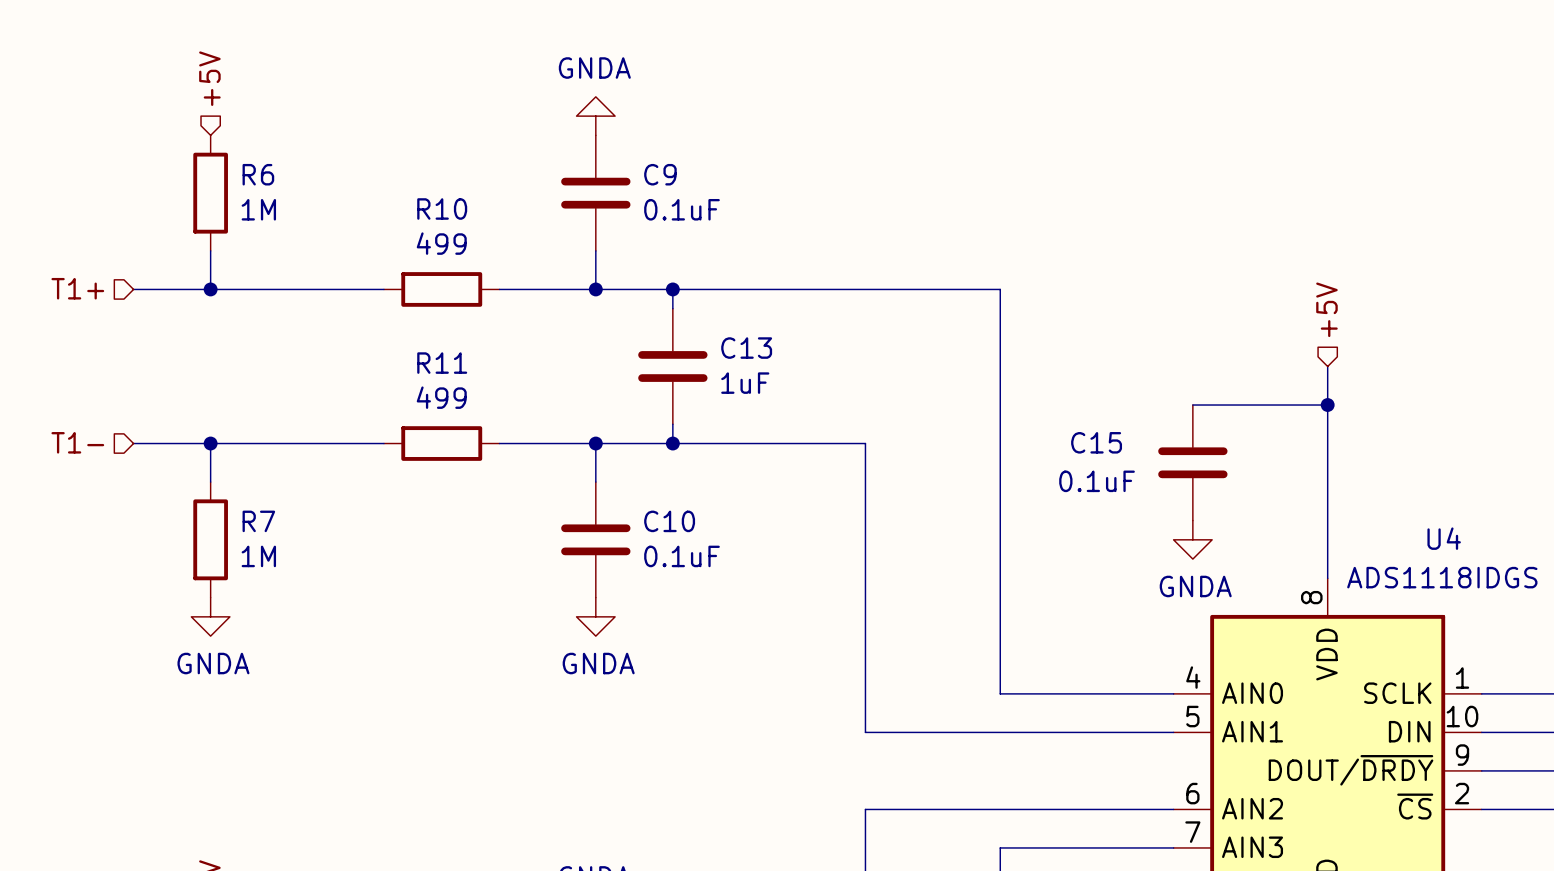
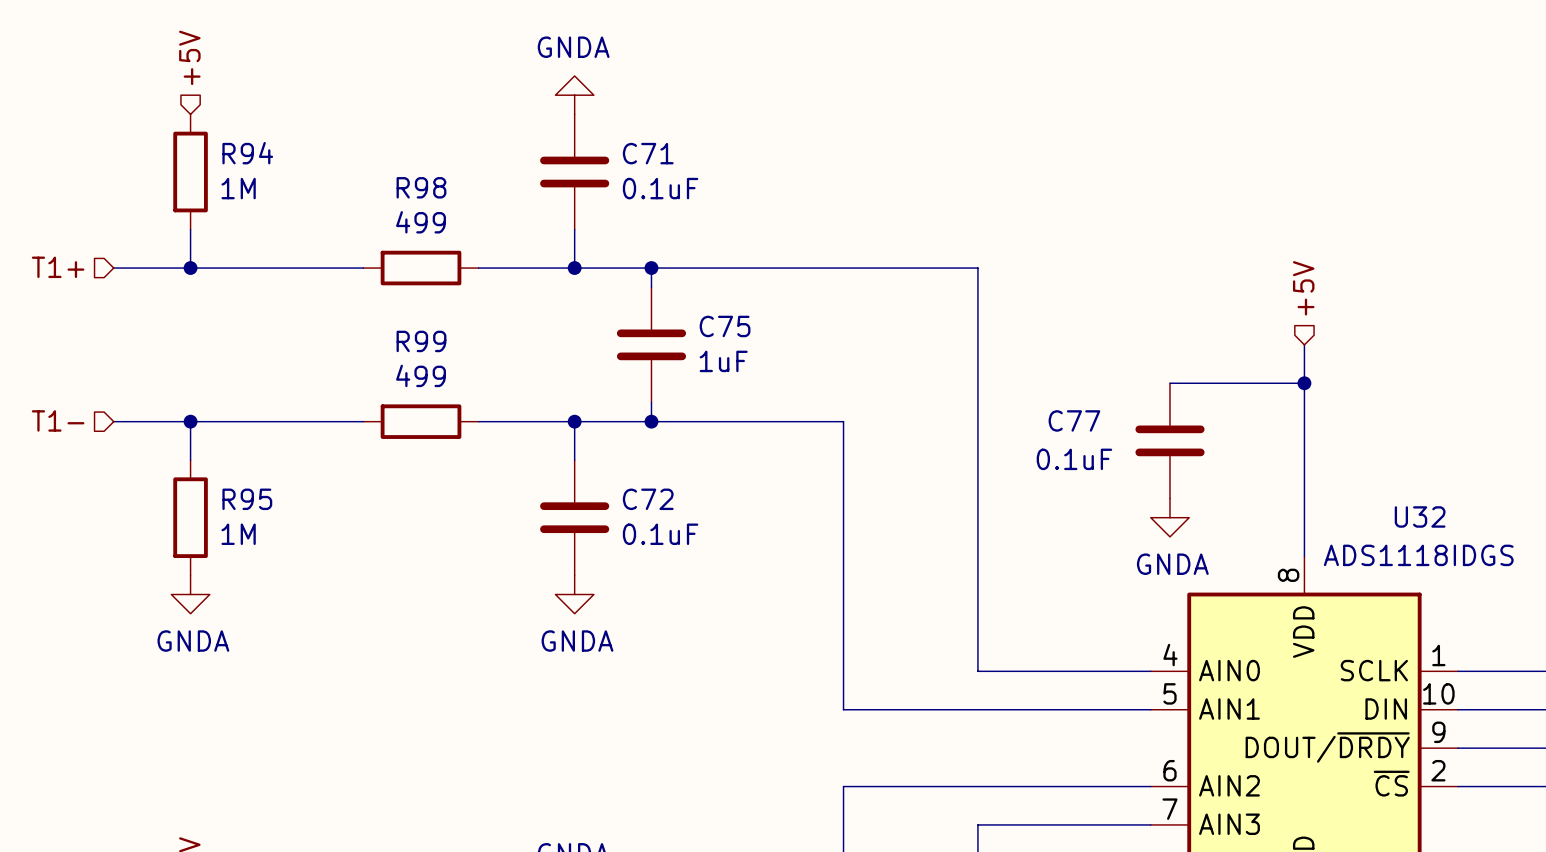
R6 name: R6 (258, 174) -> R94 (247, 153)
C9 name: C9 (660, 174) -> C71 (648, 153)
R10 name: R10 (442, 209) -> R98 (421, 187)
C13 name: C13 (746, 348) -> C75 (725, 326)
R11 name: R11 (442, 363) -> R99 (421, 341)
C15 name: C15 (1096, 442) -> C77 (1074, 420)
R7 name: R7 (258, 521) -> R95 (247, 499)
C10 name: C10 (669, 521) -> C72 (648, 499)
U4 name: U4 (1444, 538) -> U32 (1420, 516)

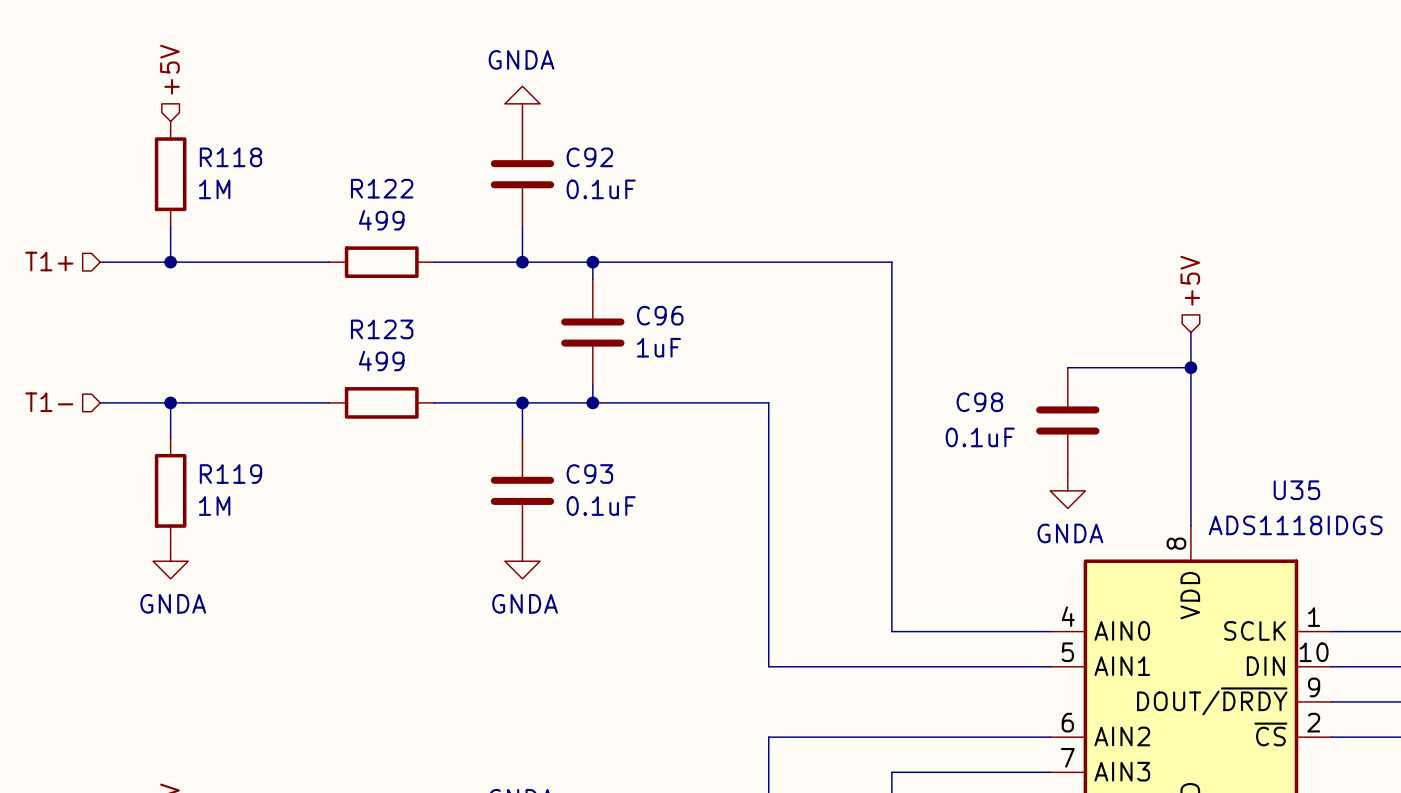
R94 name: R94 (247, 153) -> R118 (230, 157)
C71 name: C71 (648, 153) -> C92 (589, 157)
R98 name: R98 (421, 187) -> R122 (382, 188)
C75 name: C75 (725, 326) -> C96 (660, 315)
R99 name: R99 (421, 341) -> R123 (382, 329)
C77 name: C77 (1074, 420) -> C98 (979, 402)
R95 name: R95 (247, 499) -> R119 (230, 474)
C72 name: C72 (648, 499) -> C93 (589, 474)
U32 name: U32 (1420, 516) -> U35 (1296, 490)

